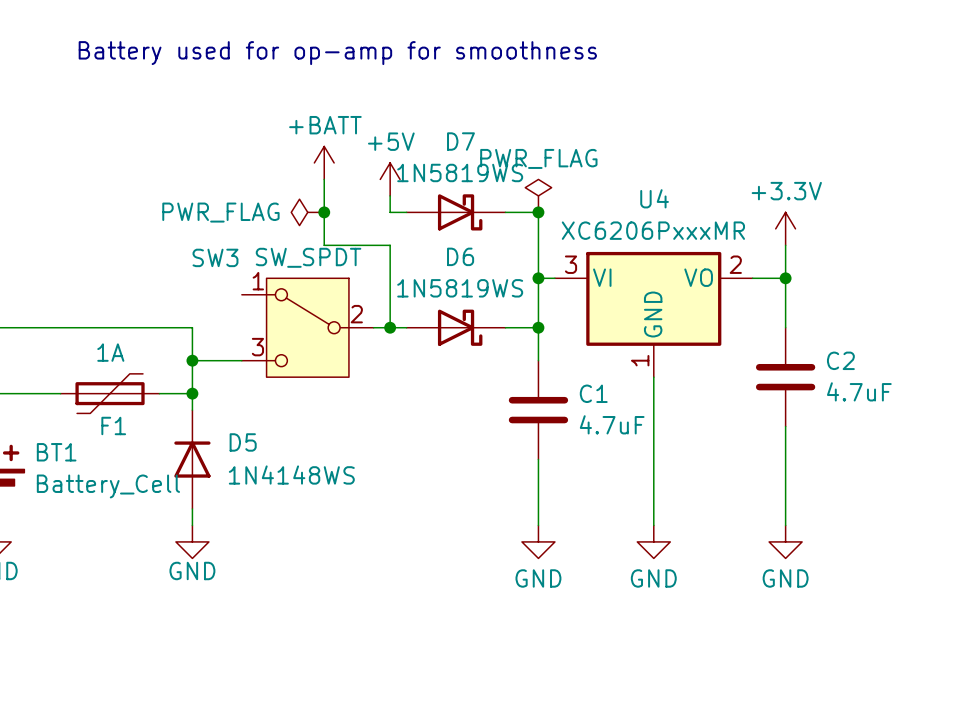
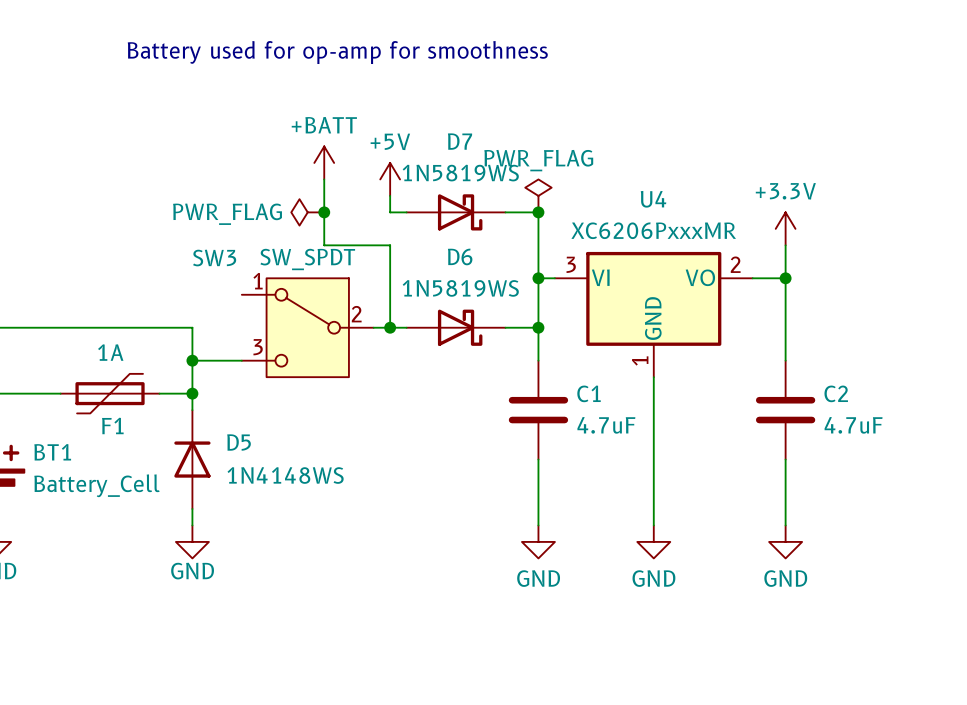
C2 position: (785, 377) -> (785, 410)

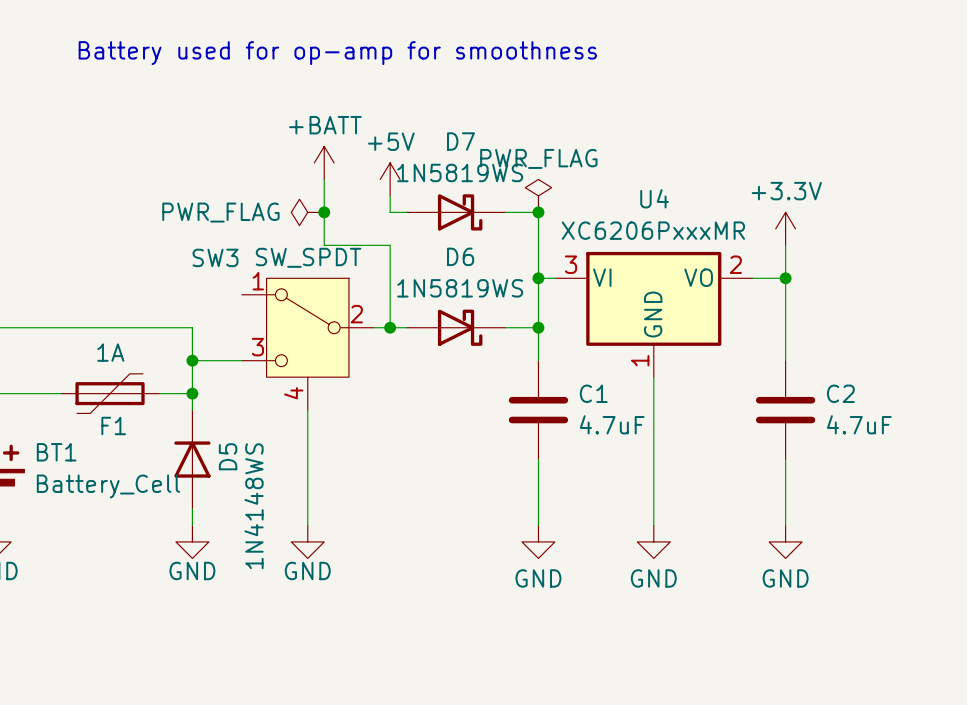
SW3 symbol: [241, 278, 374, 378] -> [241, 278, 374, 411]
wire: none -> (307, 410) (307, 525)
D5 name rotation: 0° (239, 442) -> 90° counterclockwise (228, 456)
D5 value rotation: 0° (285, 475) -> 90° counterclockwise (254, 506)
power symbol: none -> GND (307, 541)

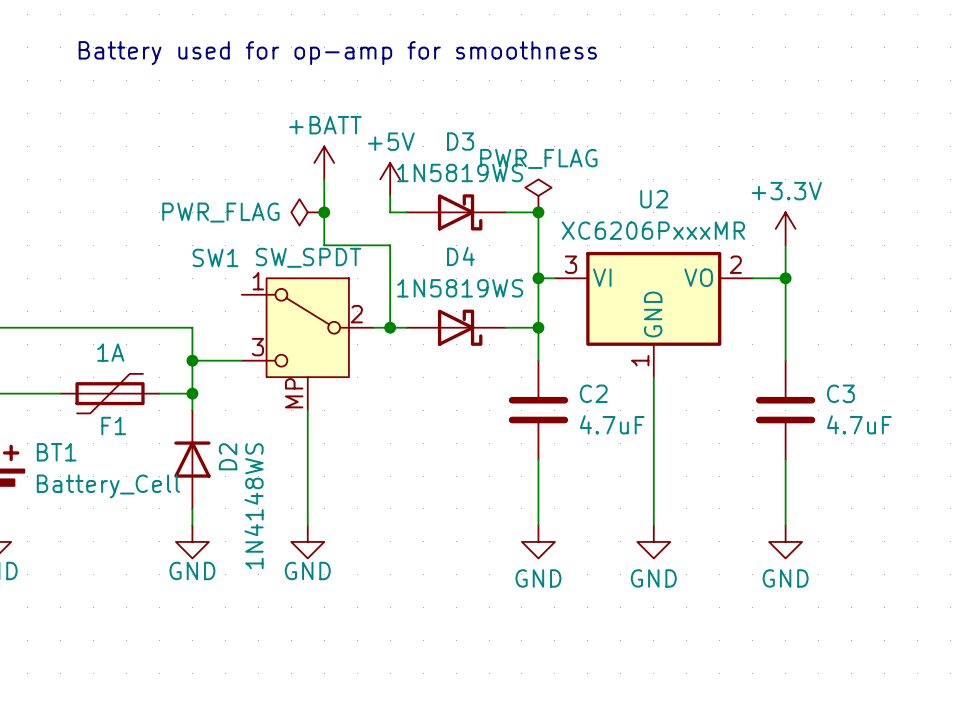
D7 name: D7 (460, 141) -> D3 (460, 141)
U4 name: U4 (654, 198) -> U2 (654, 199)
D6 name: D6 (460, 256) -> D4 (460, 256)
SW3 name: SW3 (215, 257) -> SW1 (215, 257)
SW3 pin number: 4 (293, 393) -> MP (294, 393)
C1 name: C1 (593, 393) -> C2 (593, 393)
C2 name: C2 (840, 393) -> C3 (840, 393)
D5 name: D5 (228, 456) -> D2 (228, 456)

